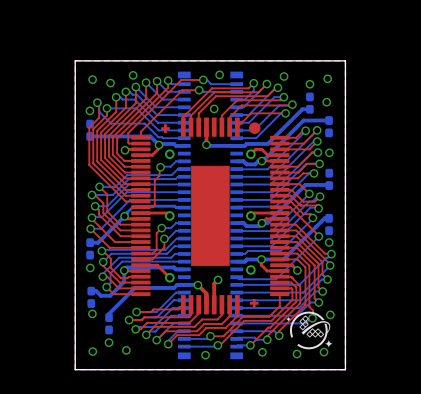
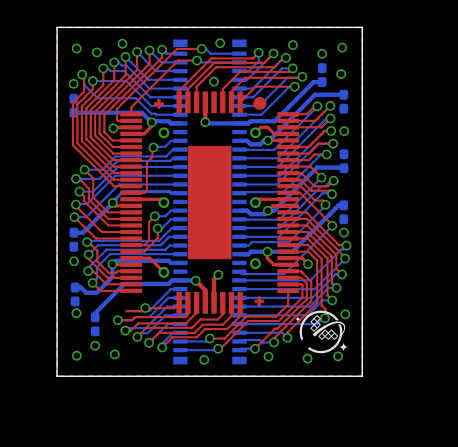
via position: (136, 311) -> (145, 307)

